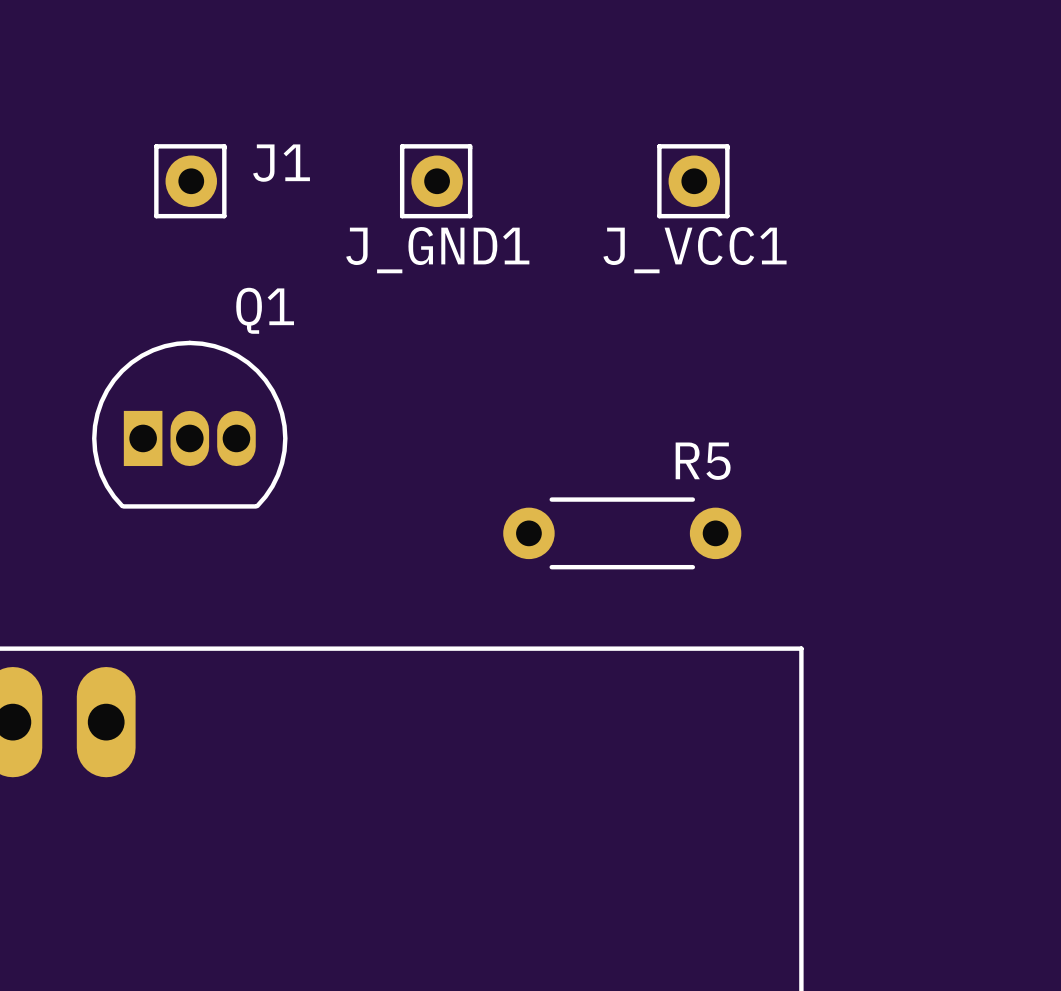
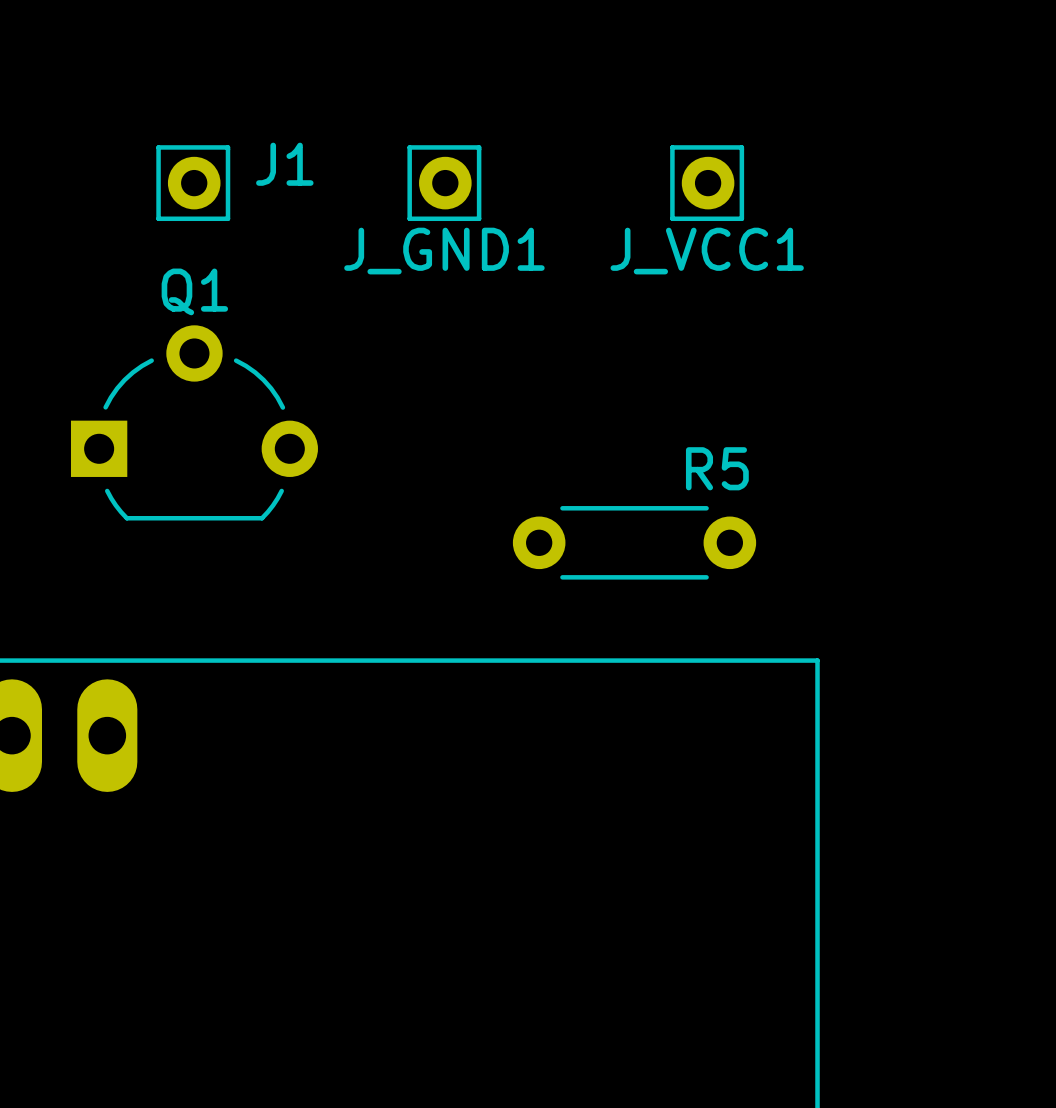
Q1 name position: Q1 (265, 310) -> Q1 (194, 291)
Q1 footprint: [92, 340, 288, 509] -> [70, 325, 318, 521]

